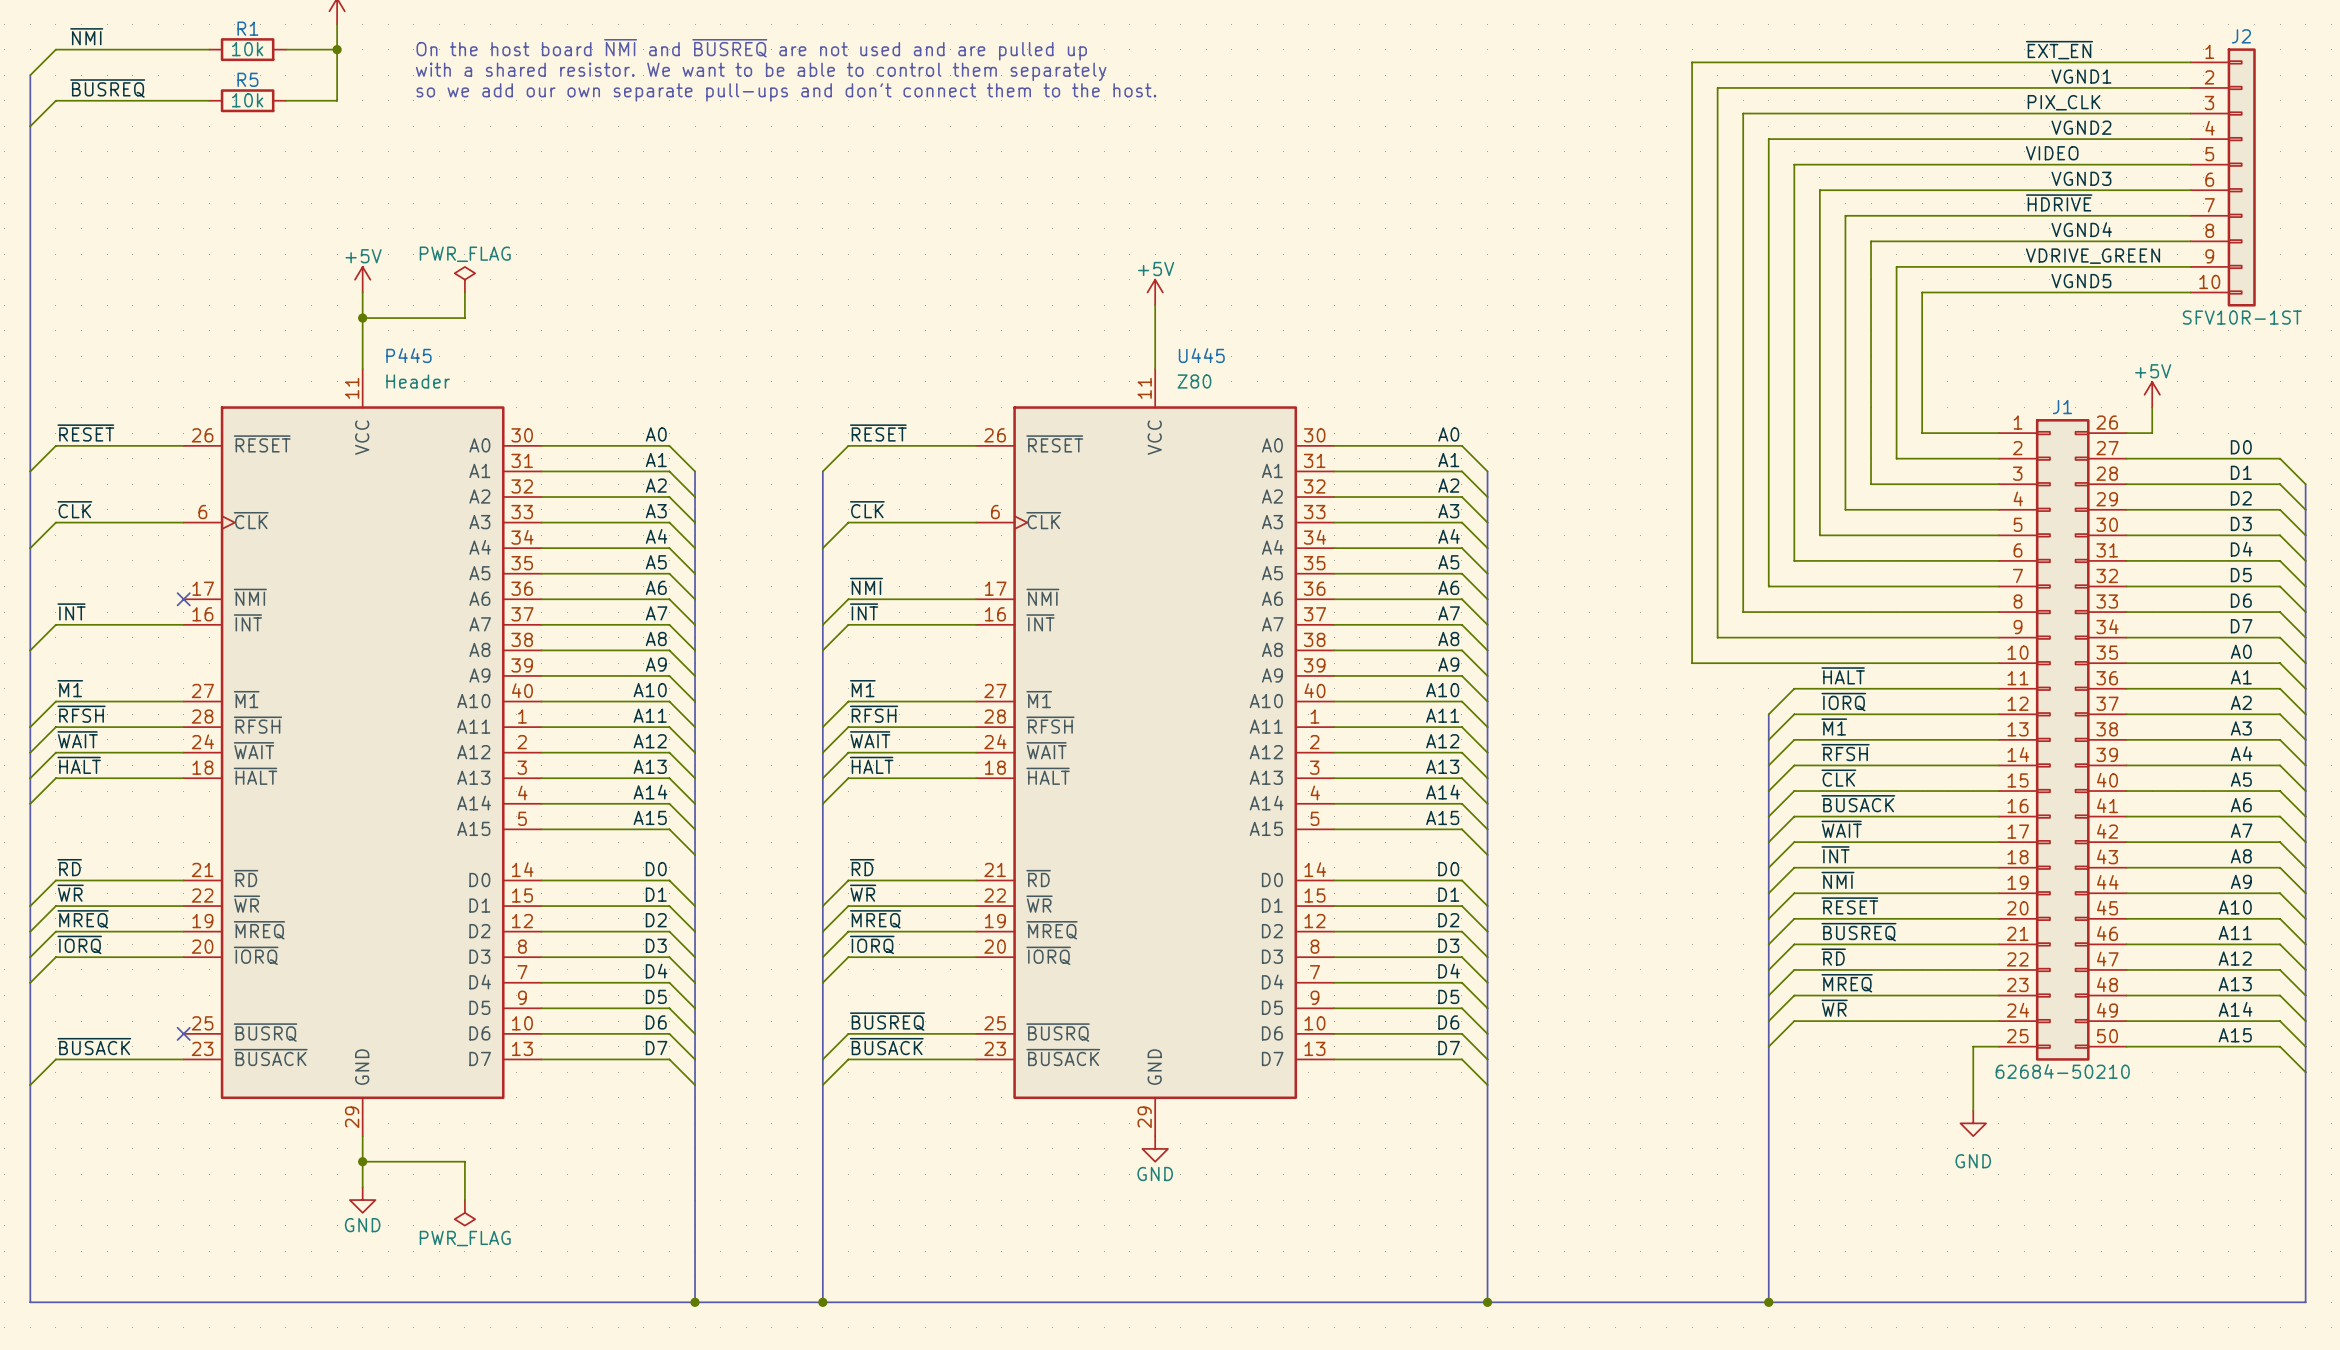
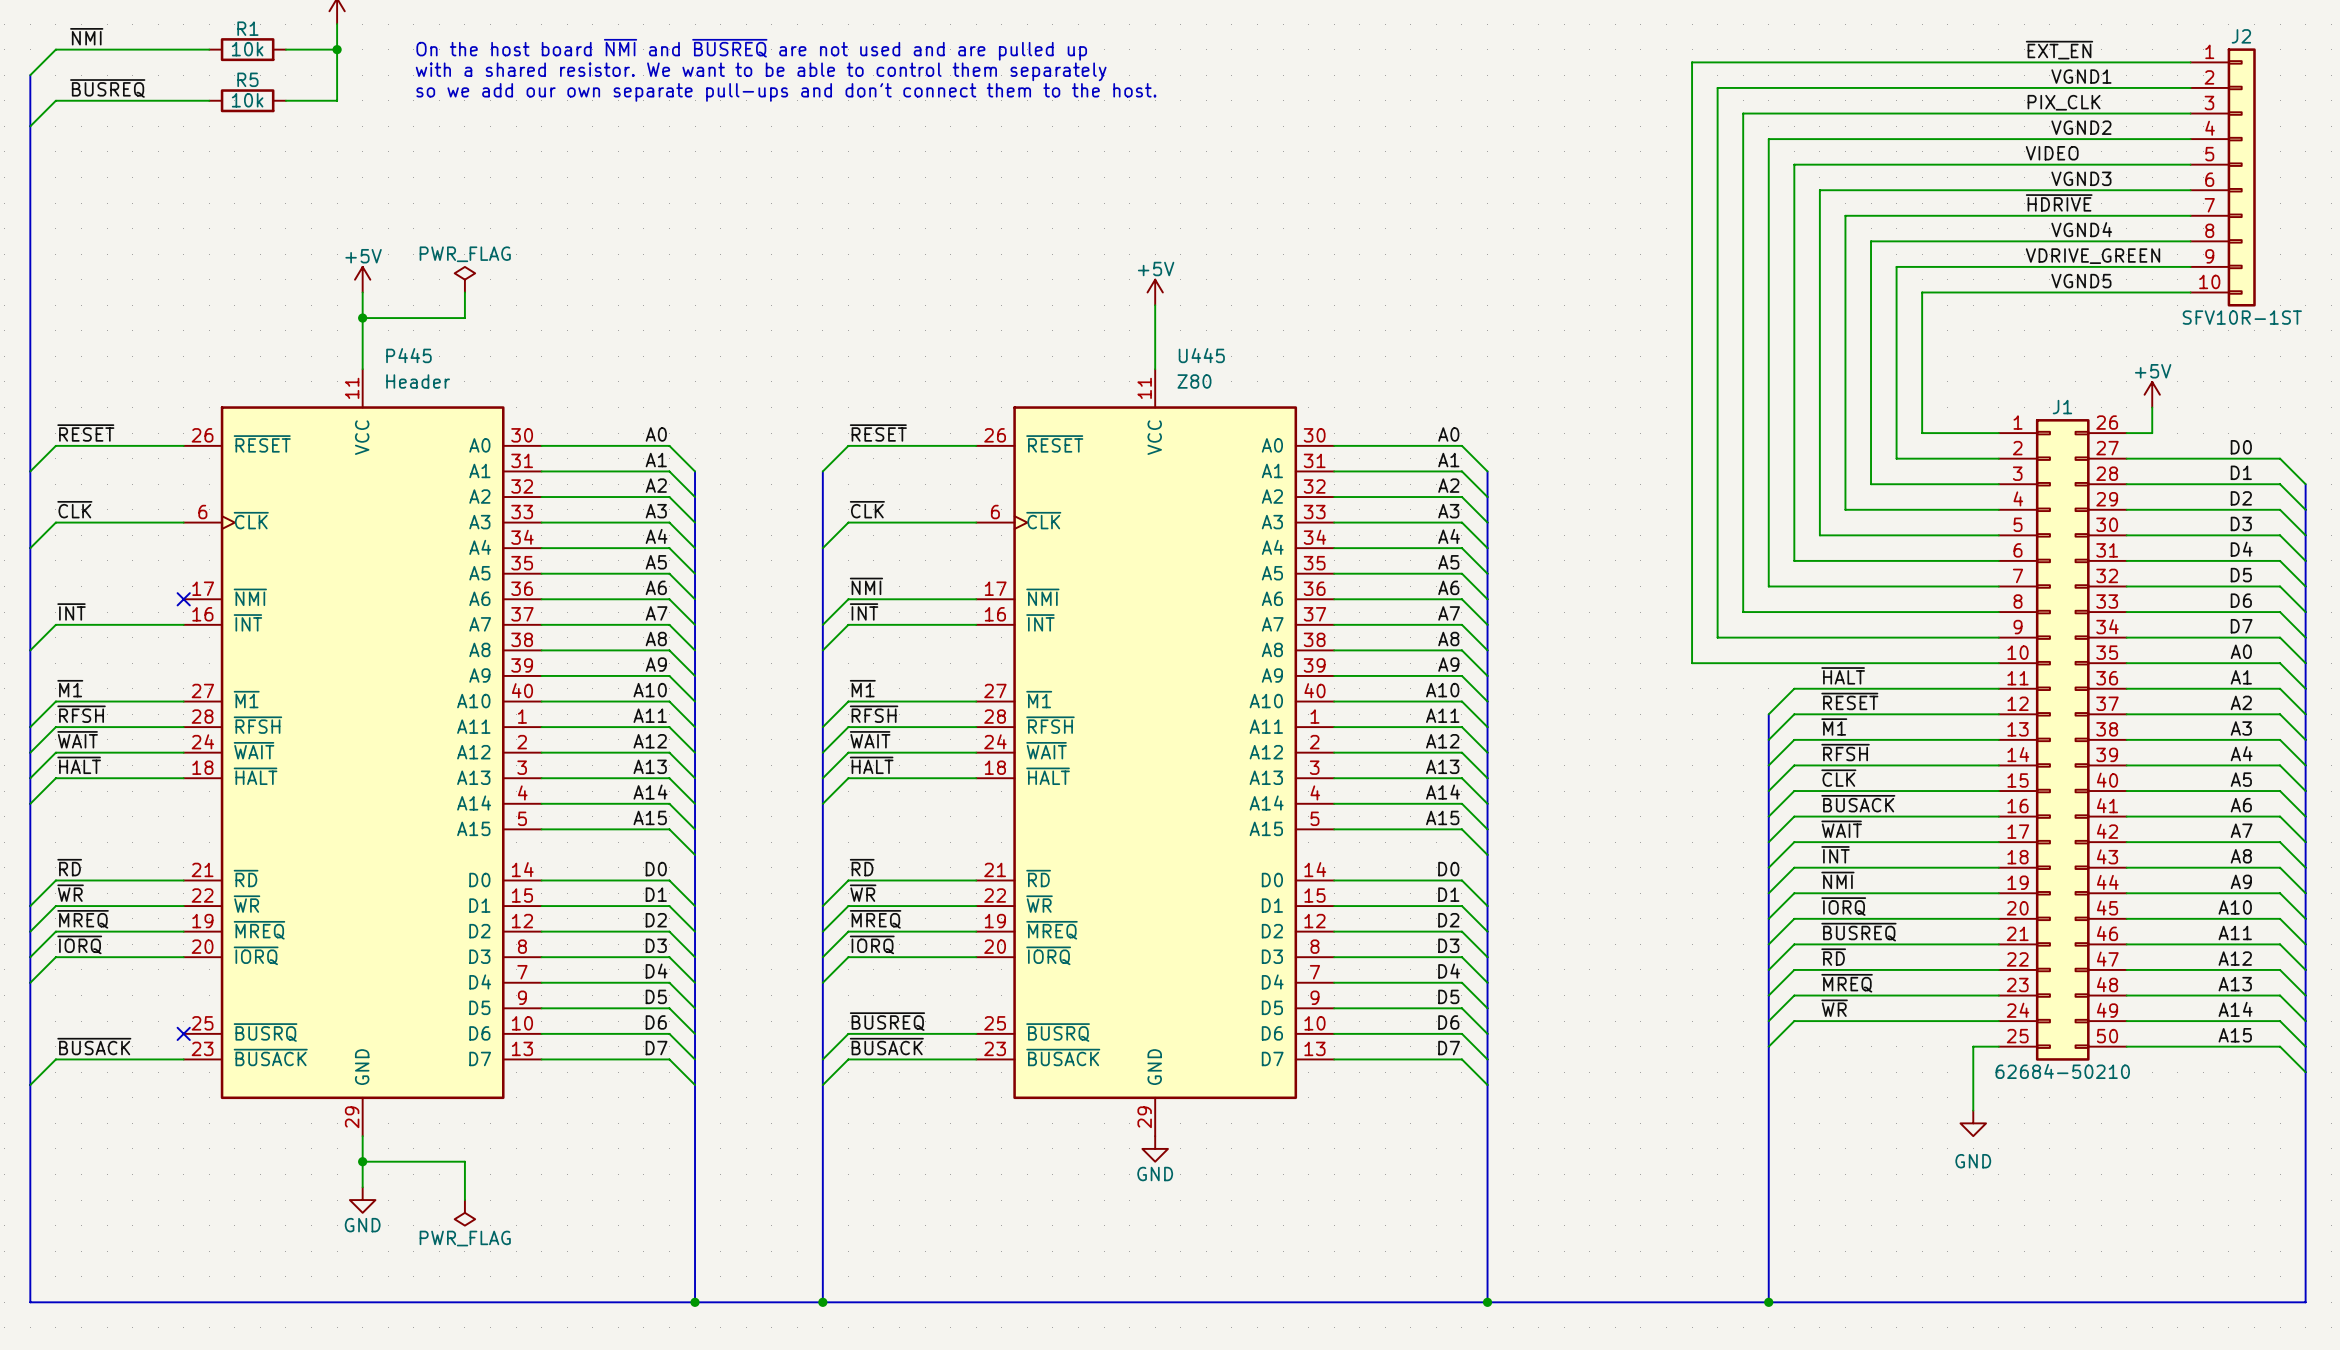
label: ~{IORQ} (1843, 702) -> ~{RESET} (1849, 701)
label: ~{RESET} (1849, 905) -> ~{IORQ} (1843, 906)

